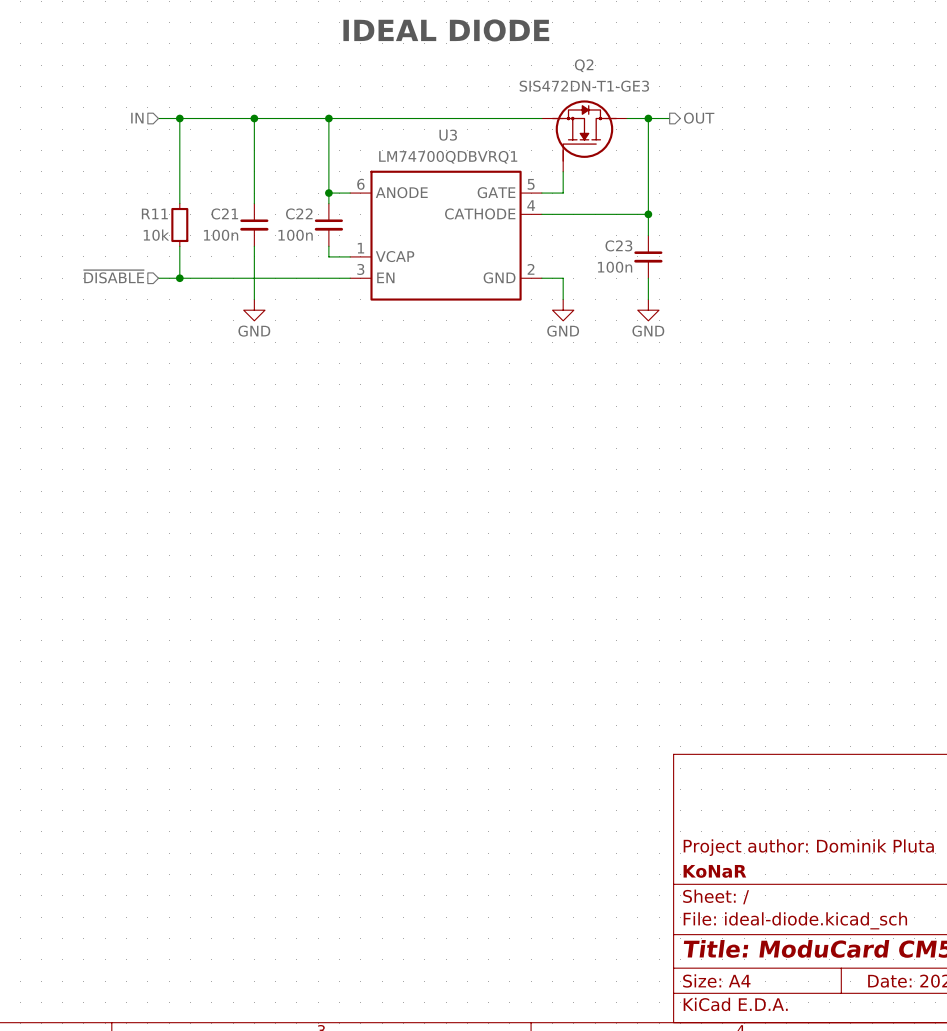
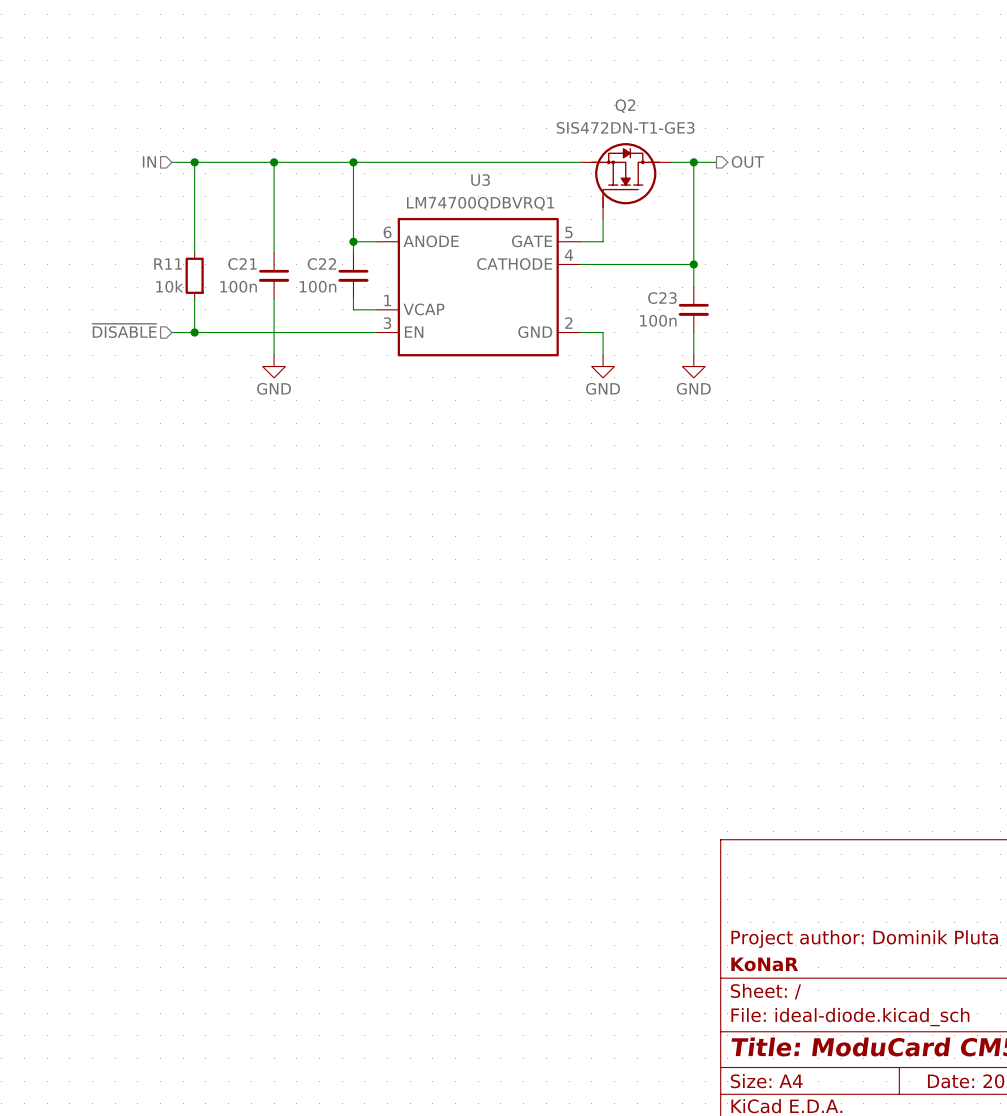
text: IDEAL DIODE (446, 30) -> none

